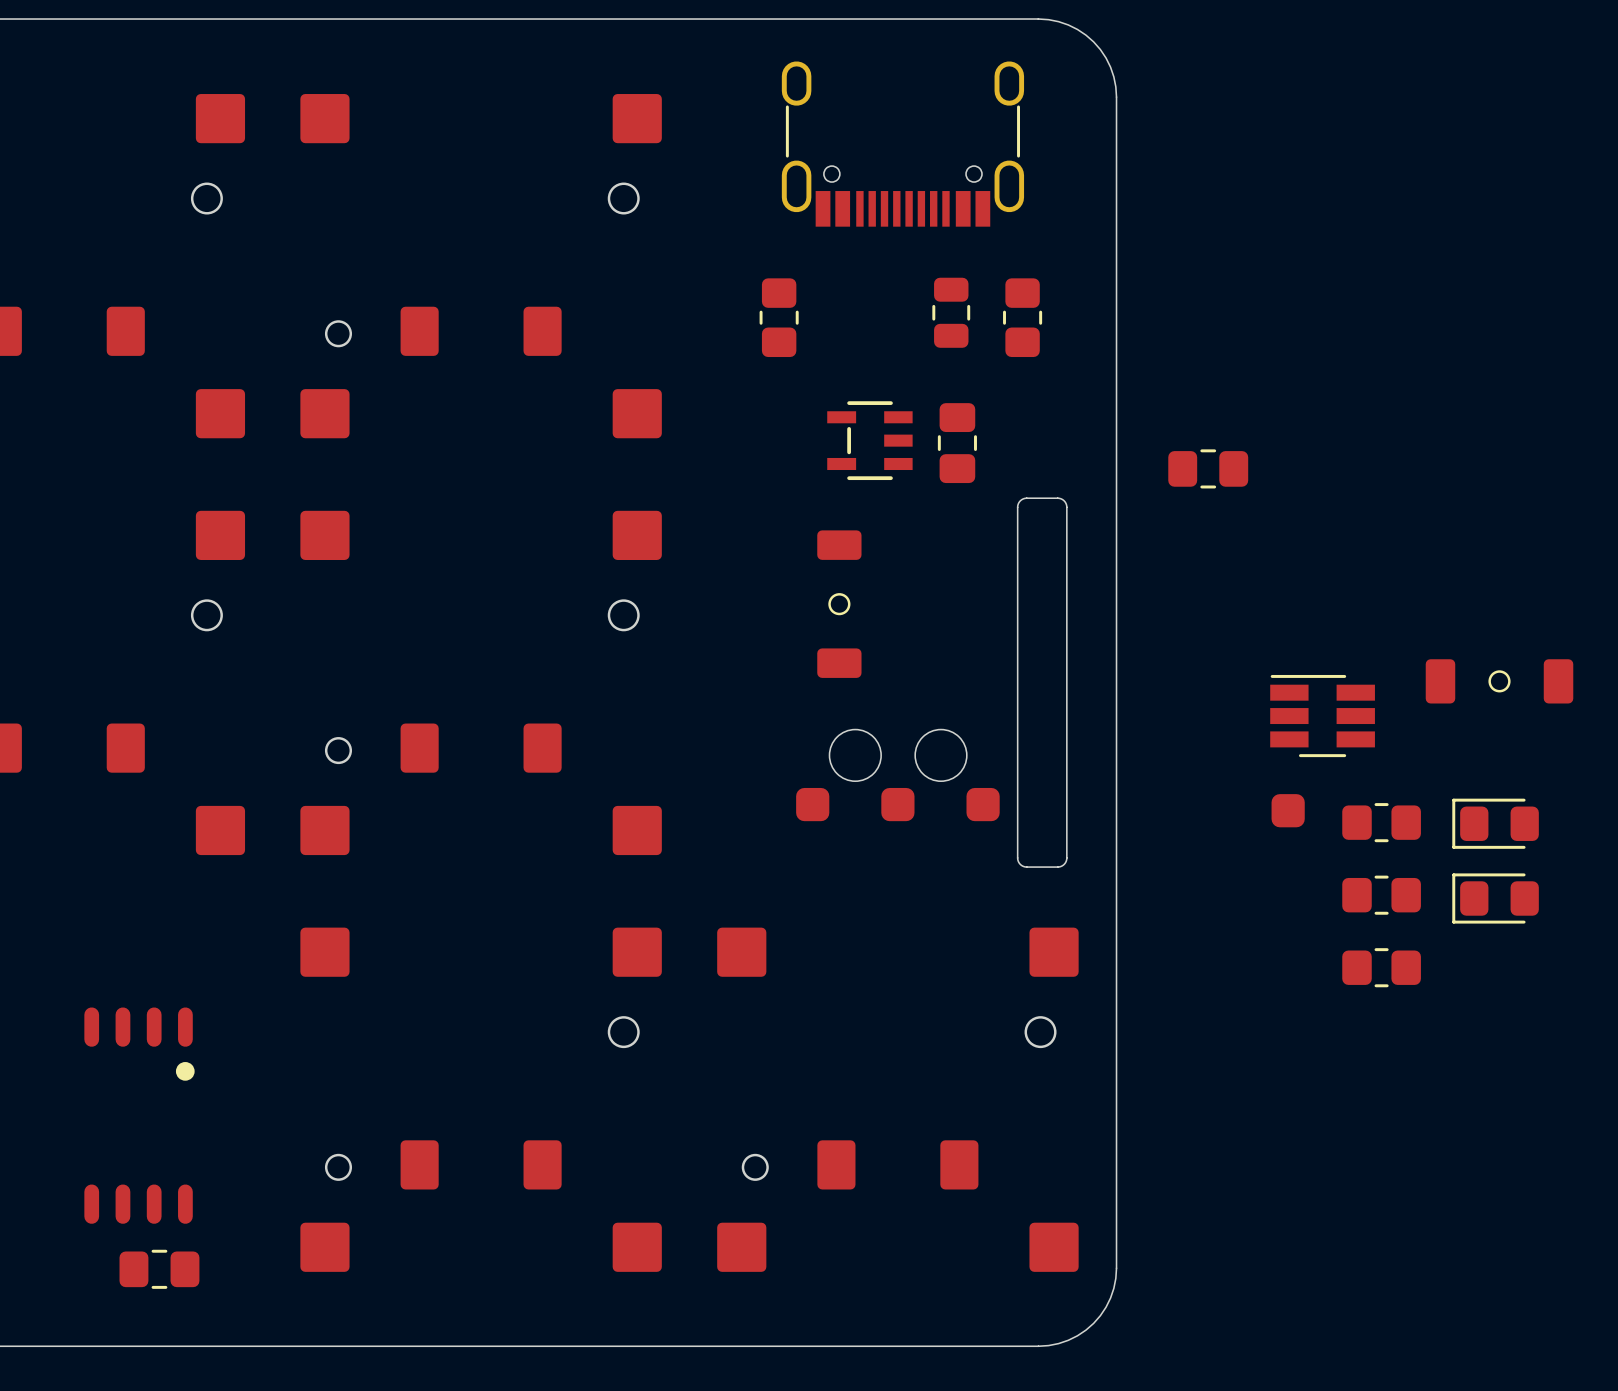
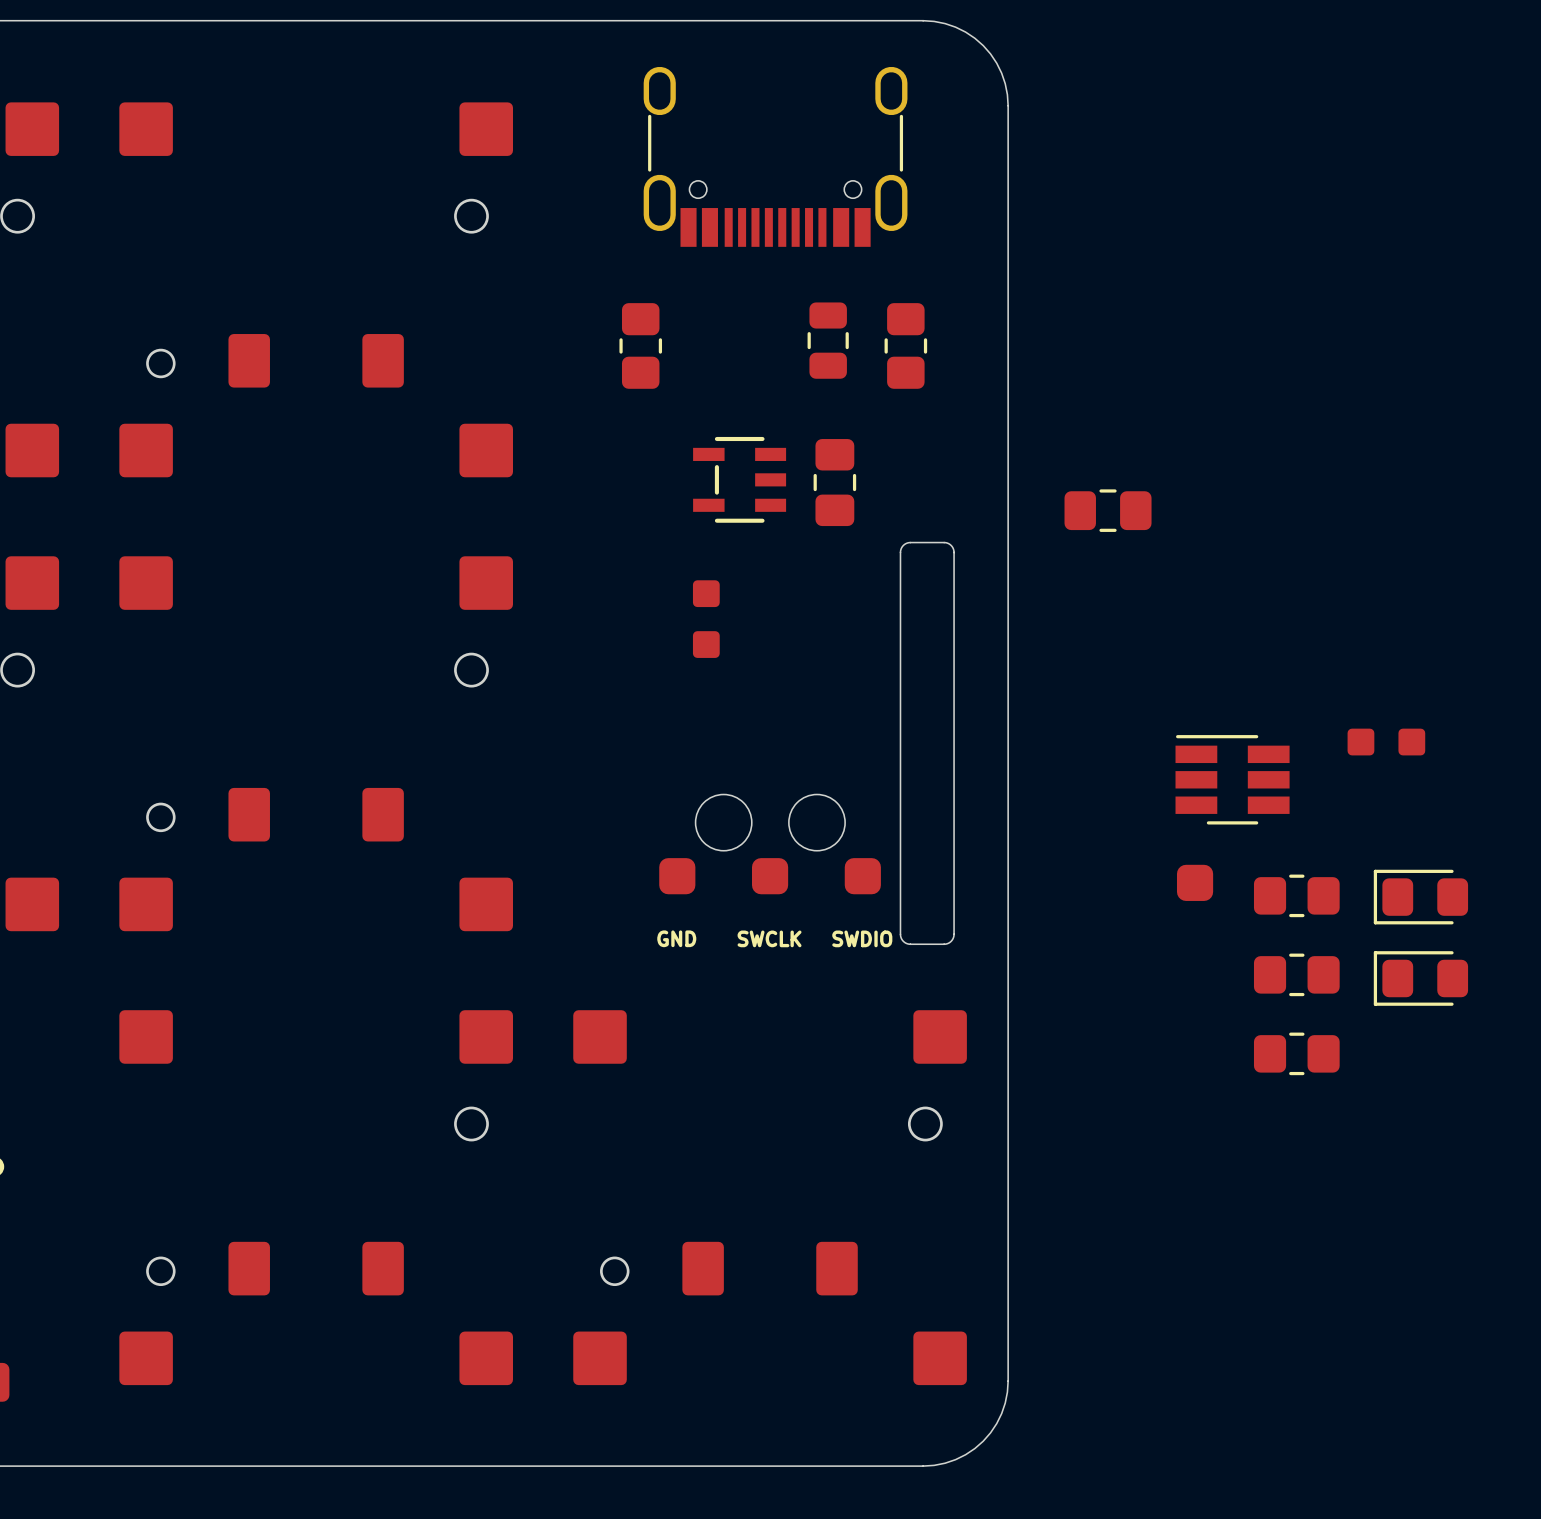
part: none -> (706, 619)
part: (839, 604) -> none
part: none -> (1386, 742)
part: (1499, 681) -> none
part value: none -> GND (676, 938)
part value: none -> SWCLK (769, 938)
part value: none -> SWDIO (862, 938)

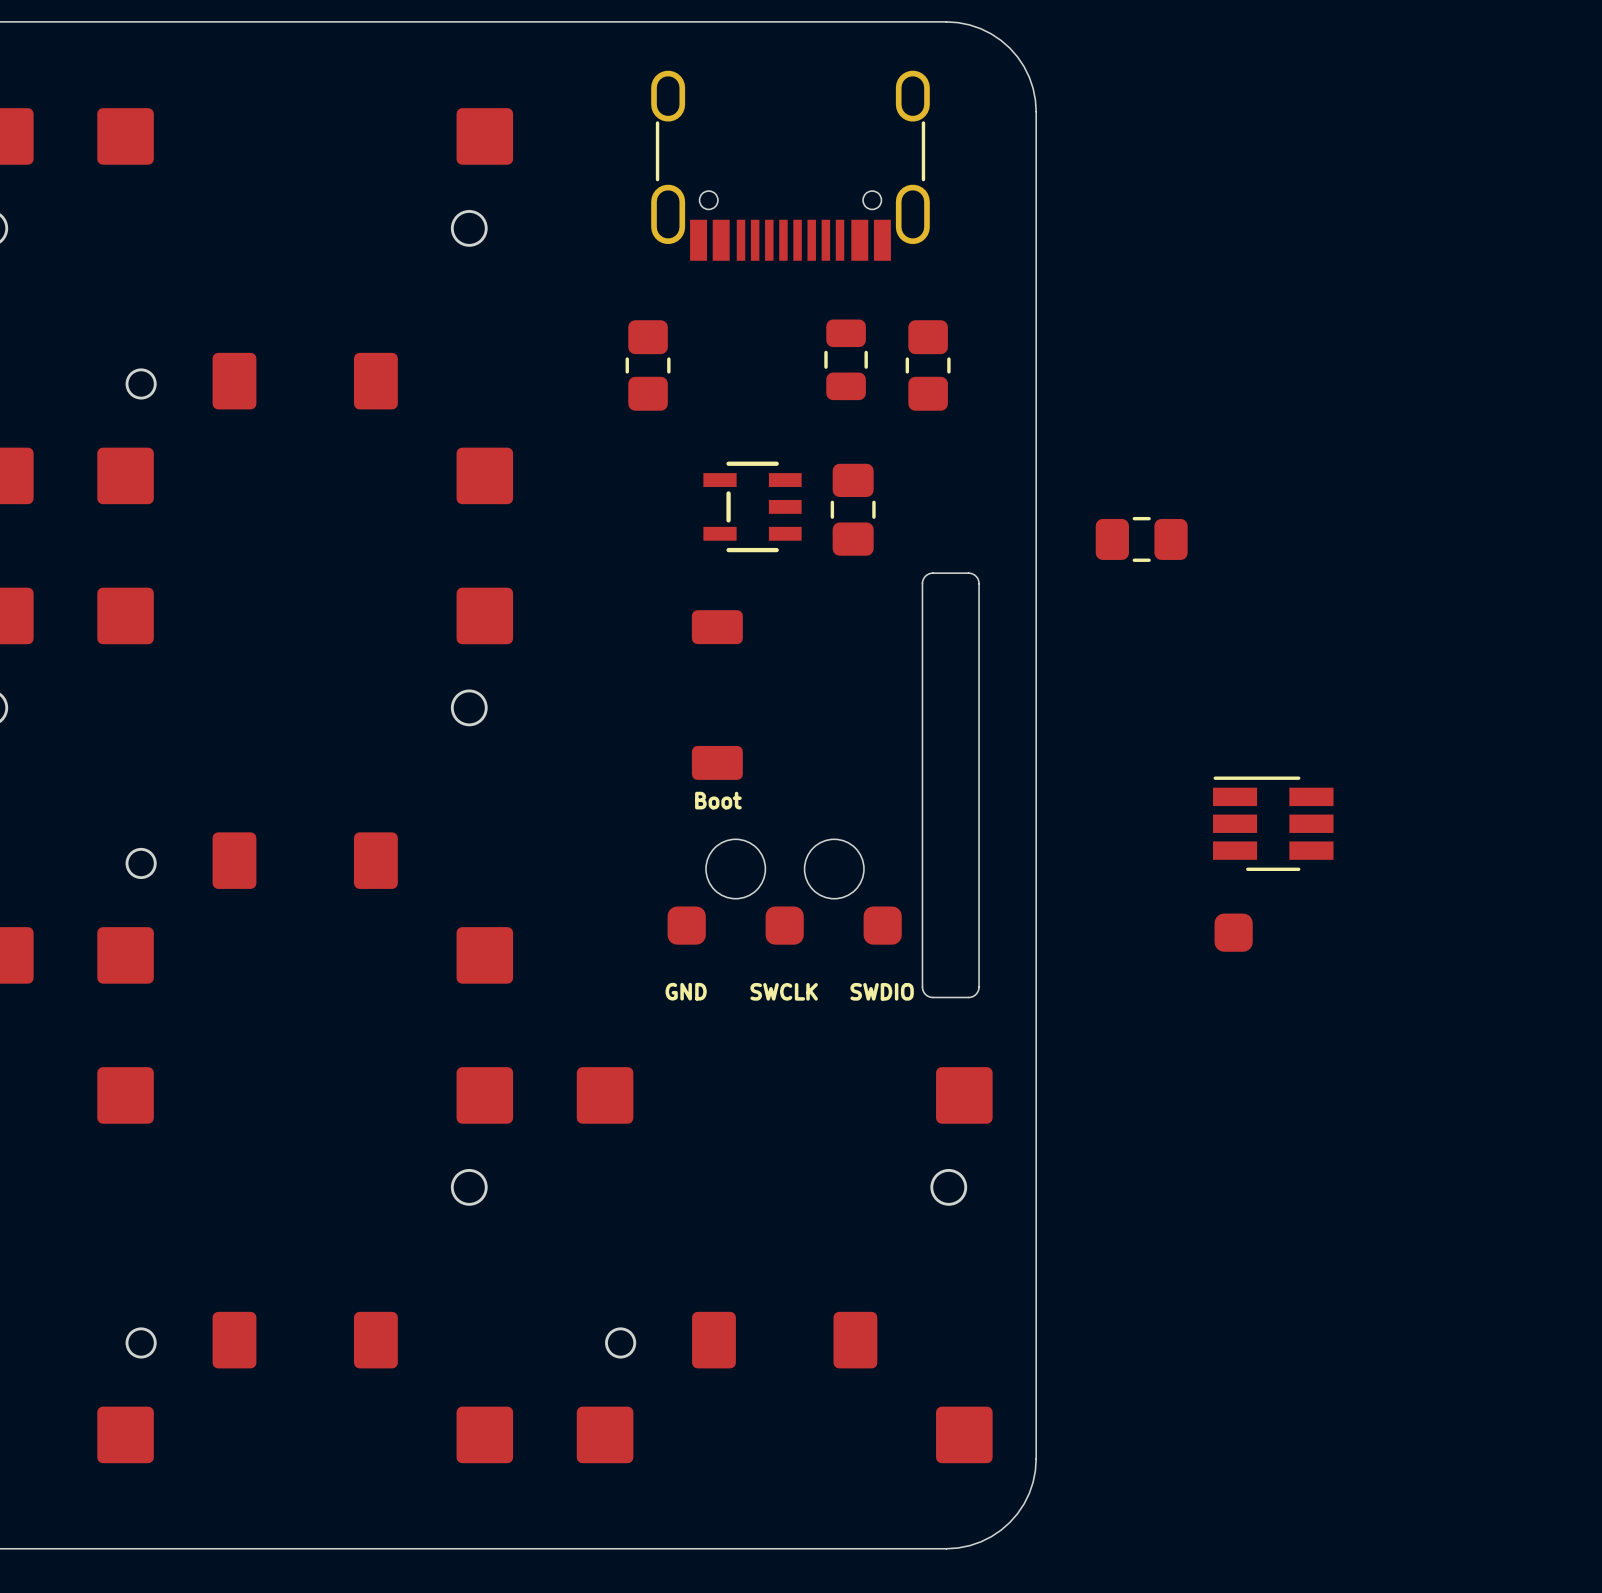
part: (706, 619) -> none
part: none -> Boot (717, 695)
part: (1386, 742) -> none
part: (1296, 895) -> none
part: (1420, 897) -> none
part: (1296, 974) -> none
part: (1420, 978) -> none
part: (1296, 1053) -> none

